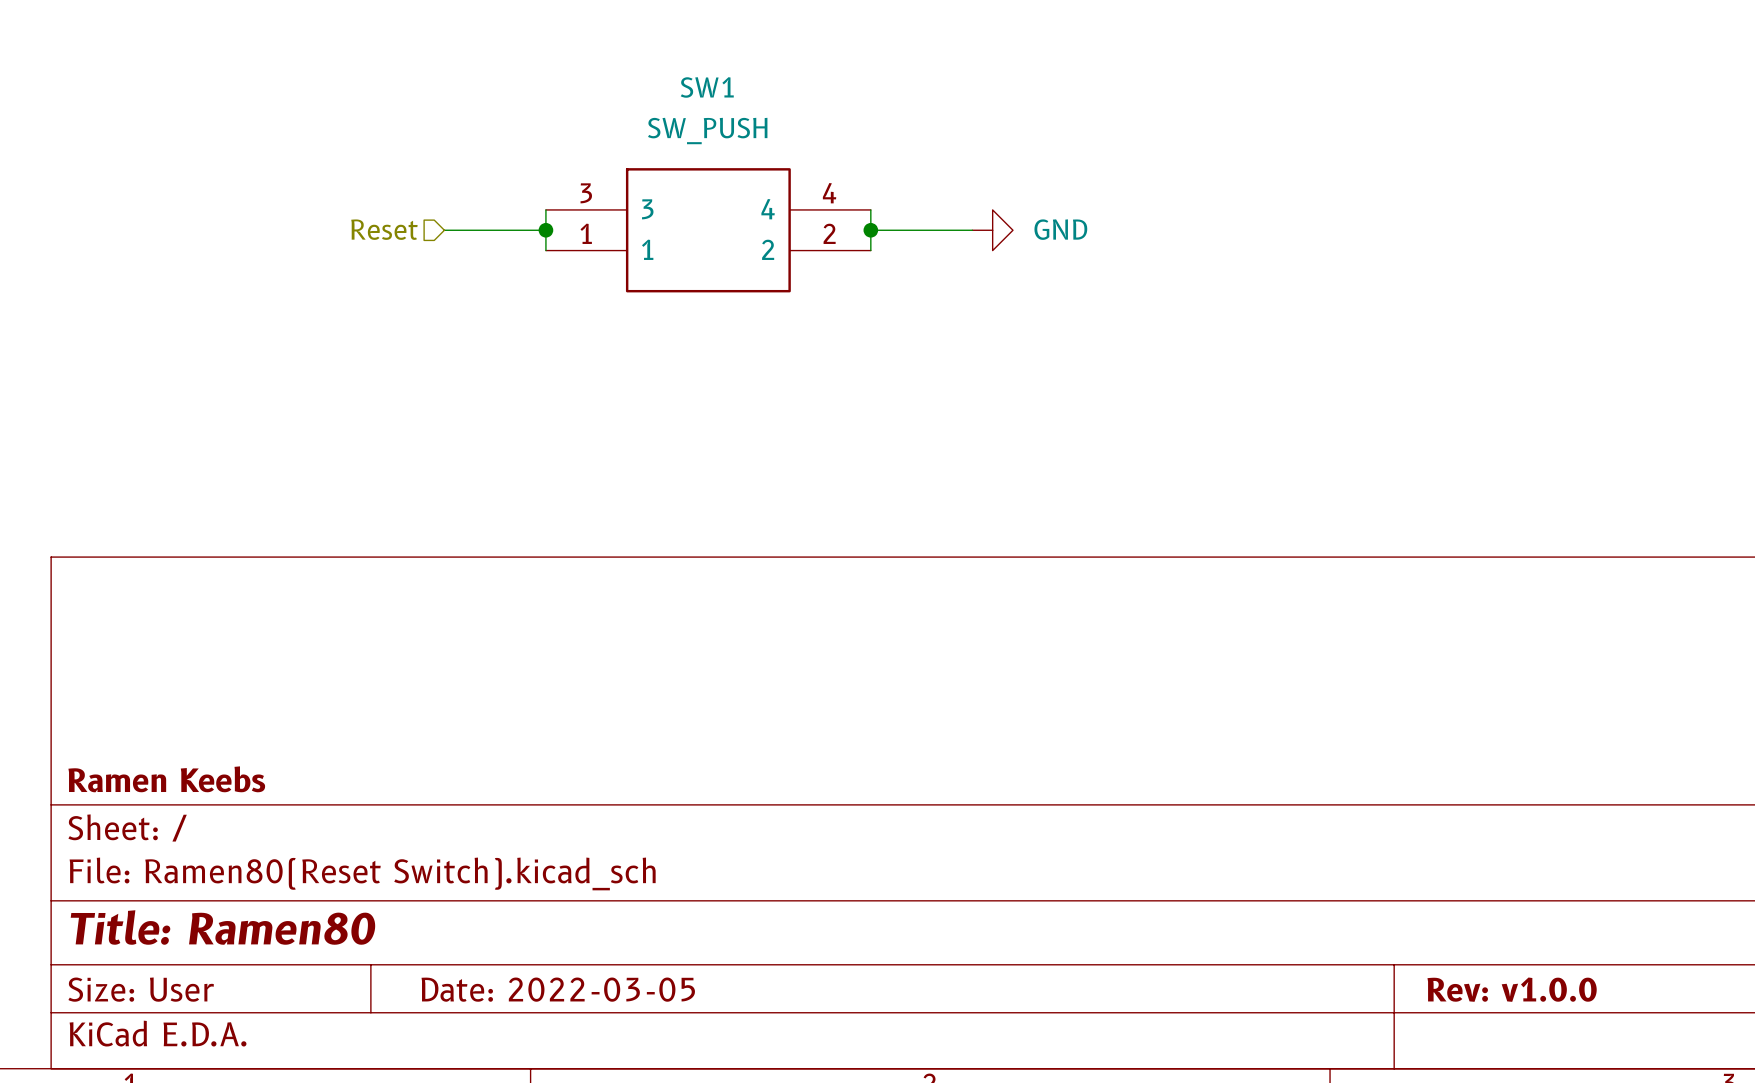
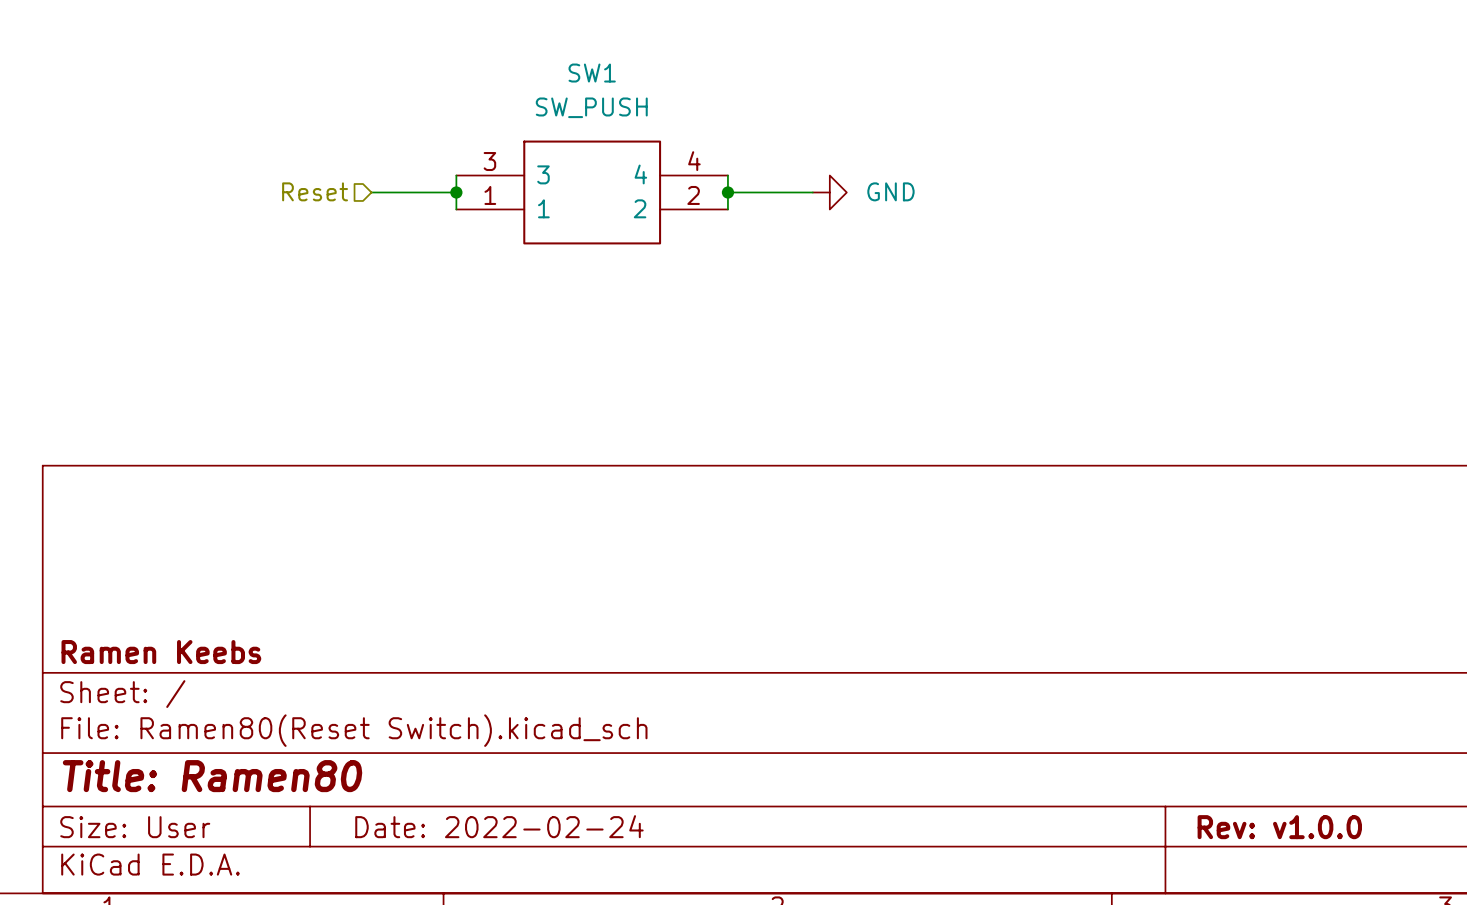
title block: Date: 2022-03-05 (558, 989) -> Date: 2022-02-24 (499, 826)

